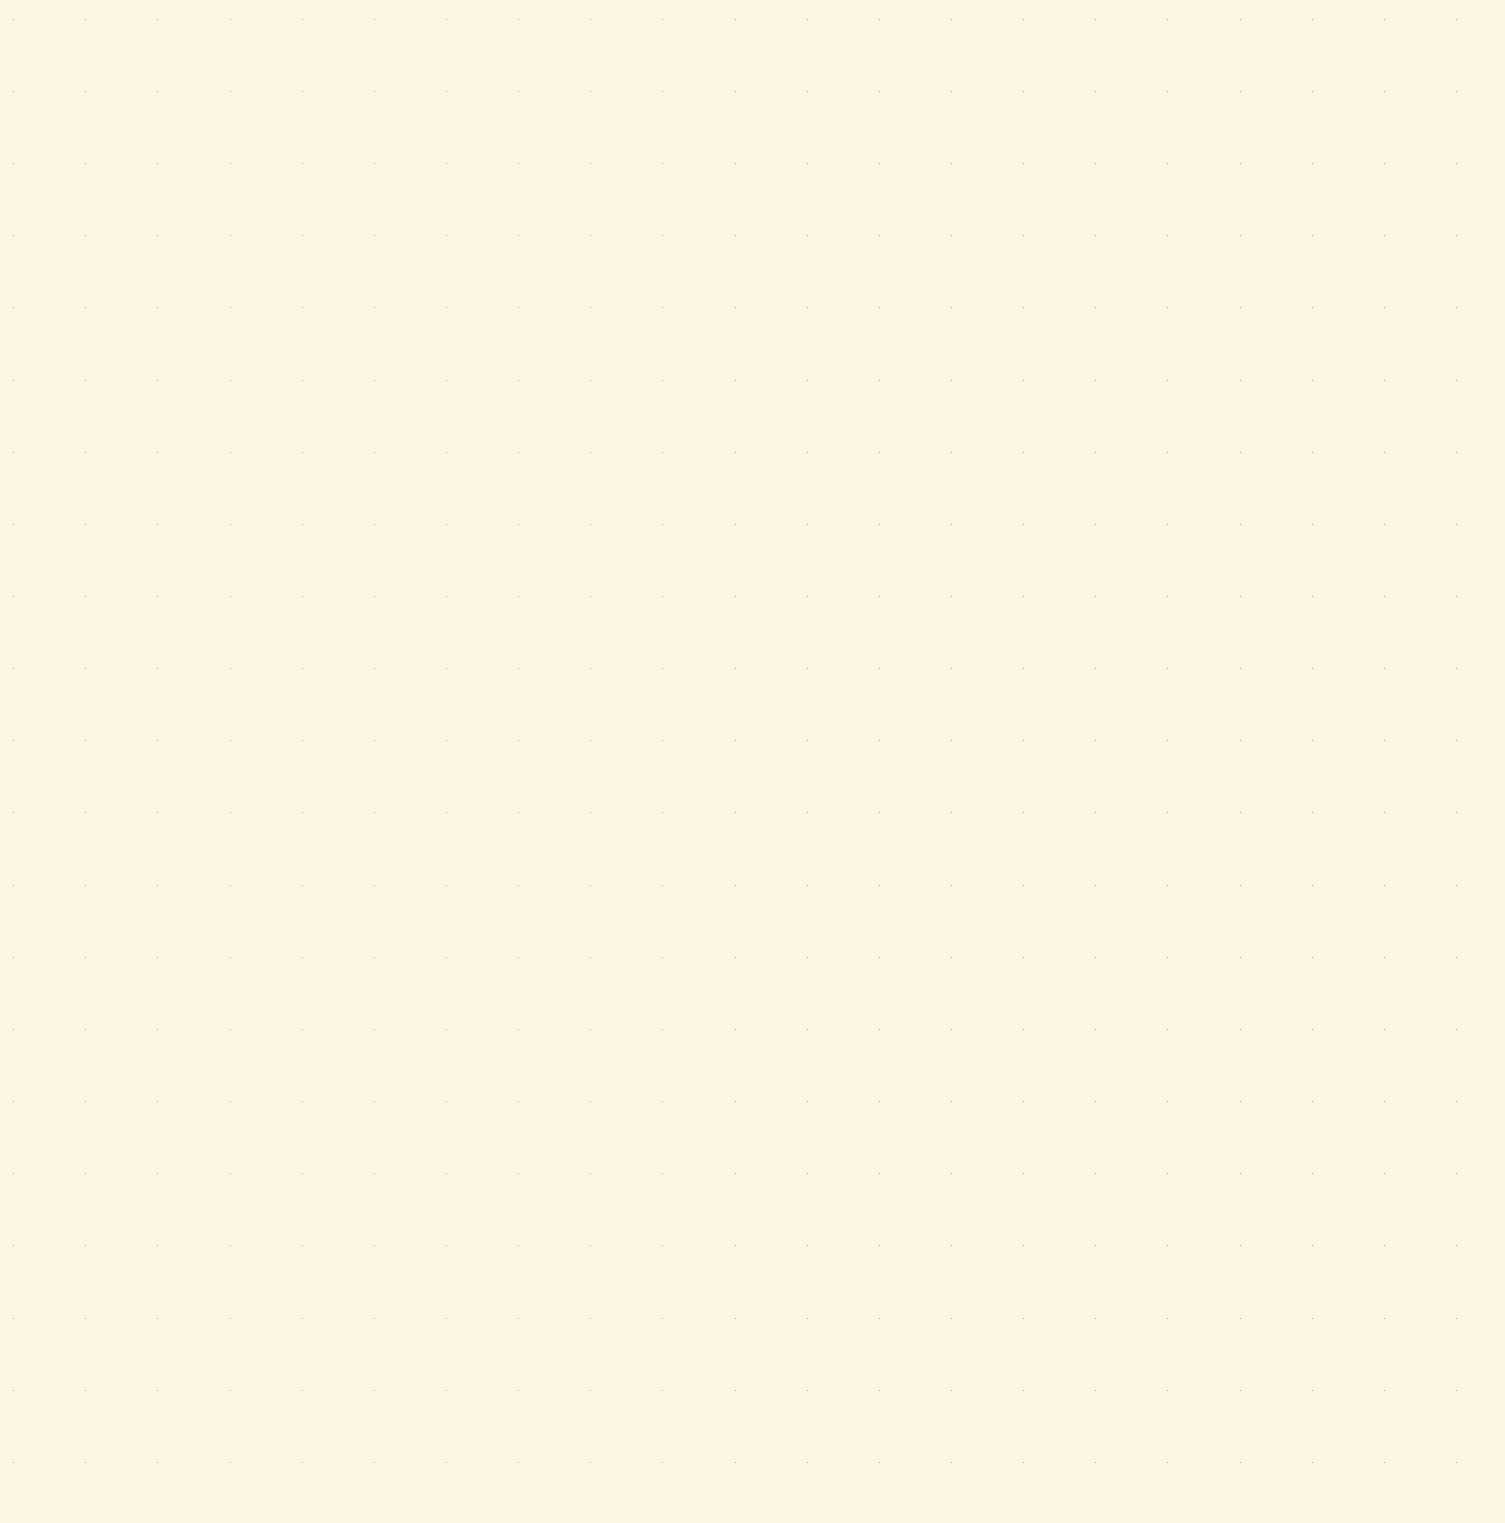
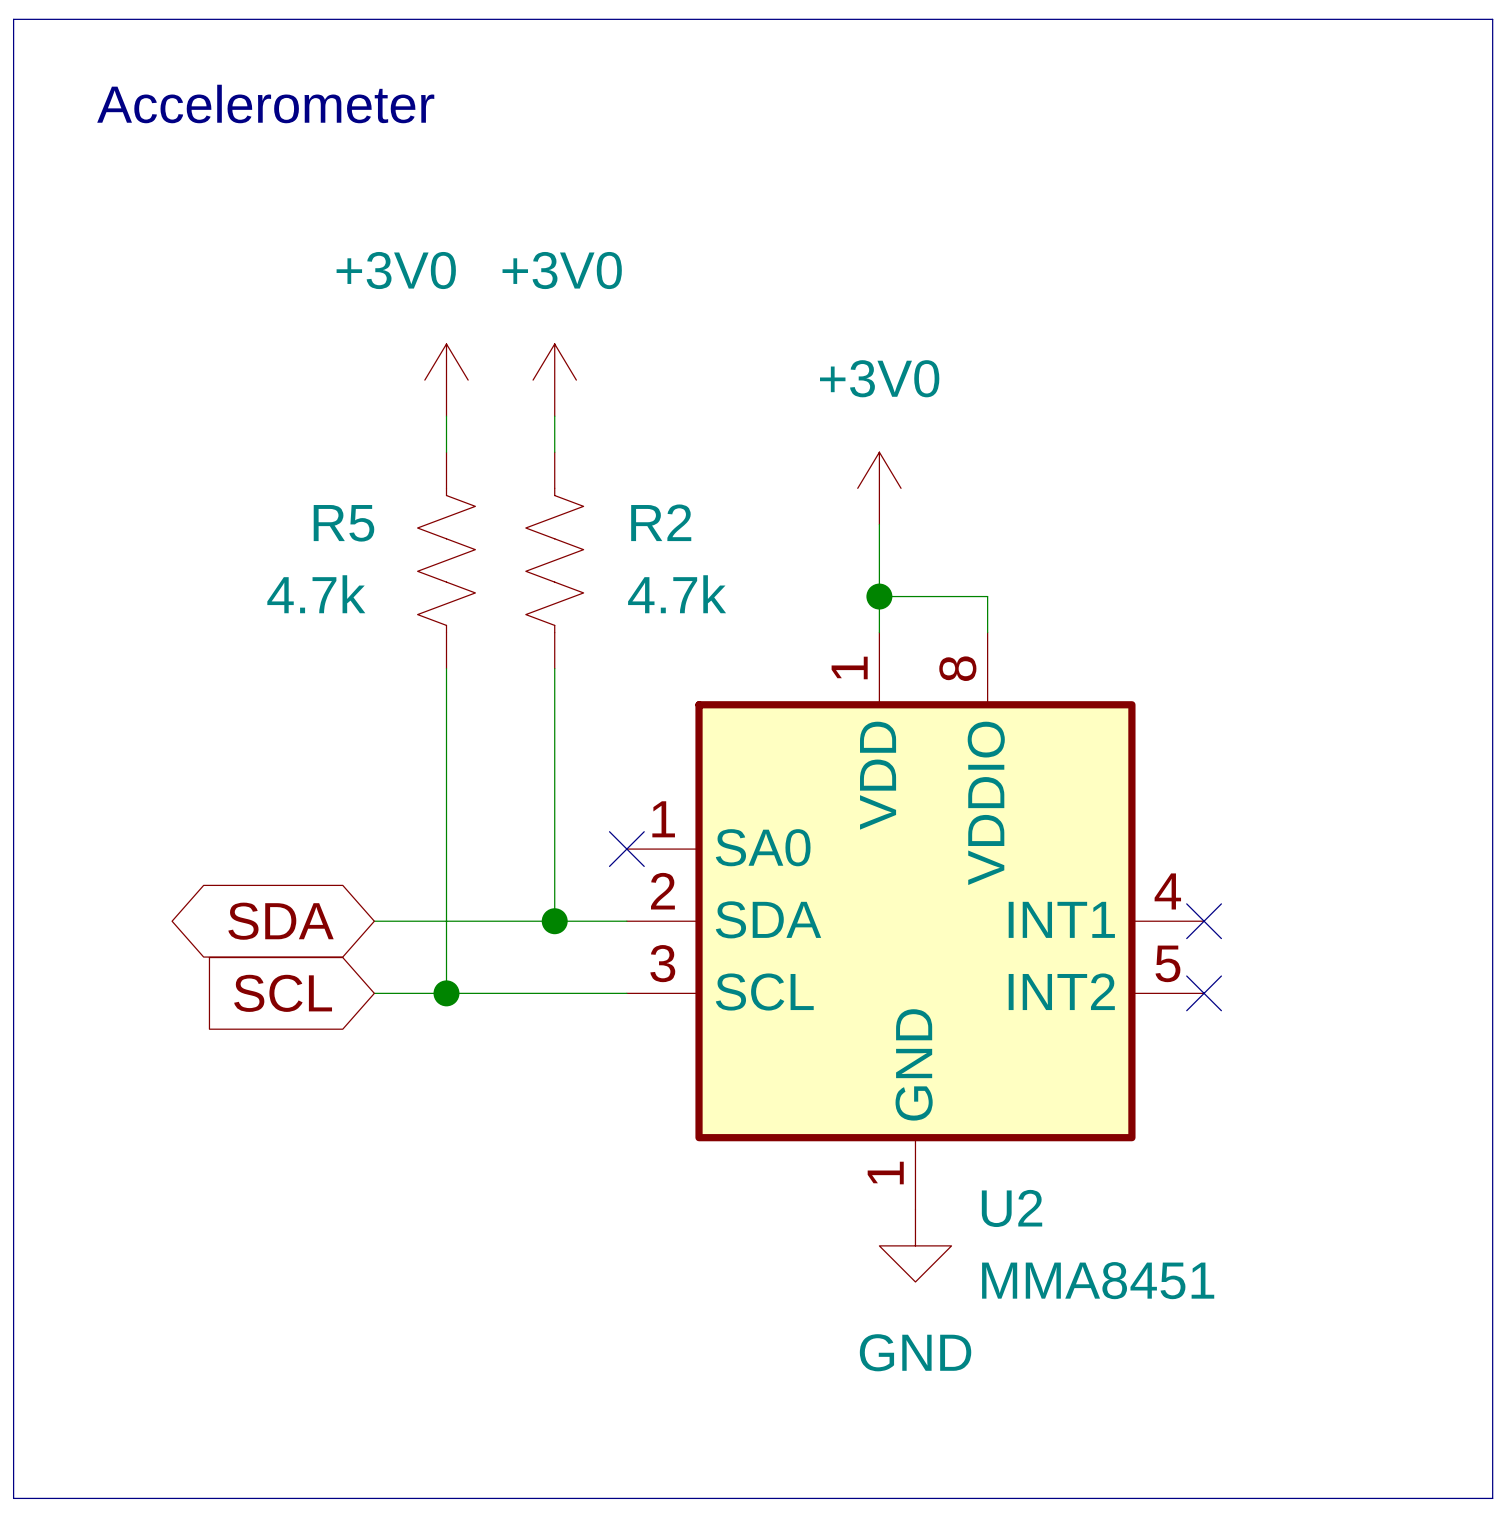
line: none -> (13, 19) (1492, 19) (1492, 1498) (13, 1498) (13, 19)
text: none -> Accelerometer (265, 103)
power symbol: none -> +3V0 (446, 380)
power symbol: none -> +3V0 (554, 380)
wire: none -> (446, 416) (446, 452)
wire: none -> (554, 416) (554, 452)
power symbol: none -> +3V0 (879, 488)
wire: none -> (879, 524) (879, 632)
R5: none -> 4.7k (446, 560)
R2: none -> 4.7k (554, 560)
wire: none -> (879, 596) (987, 596) (987, 632)
junction: none -> (879, 596)
wire: none -> (446, 668) (446, 993)
wire: none -> (554, 668) (554, 921)
no-connect mark: none -> (626, 849)
global label: none -> SDA (280, 921)
wire: none -> (374, 921) (626, 921)
junction: none -> (554, 921)
U2: none -> MMA8451 (915, 921)
no-connect mark: none -> (1204, 921)
global label: none -> SCL (283, 993)
wire: none -> (374, 993) (626, 993)
junction: none -> (446, 993)
no-connect mark: none -> (1204, 993)
power symbol: none -> GND (915, 1245)

